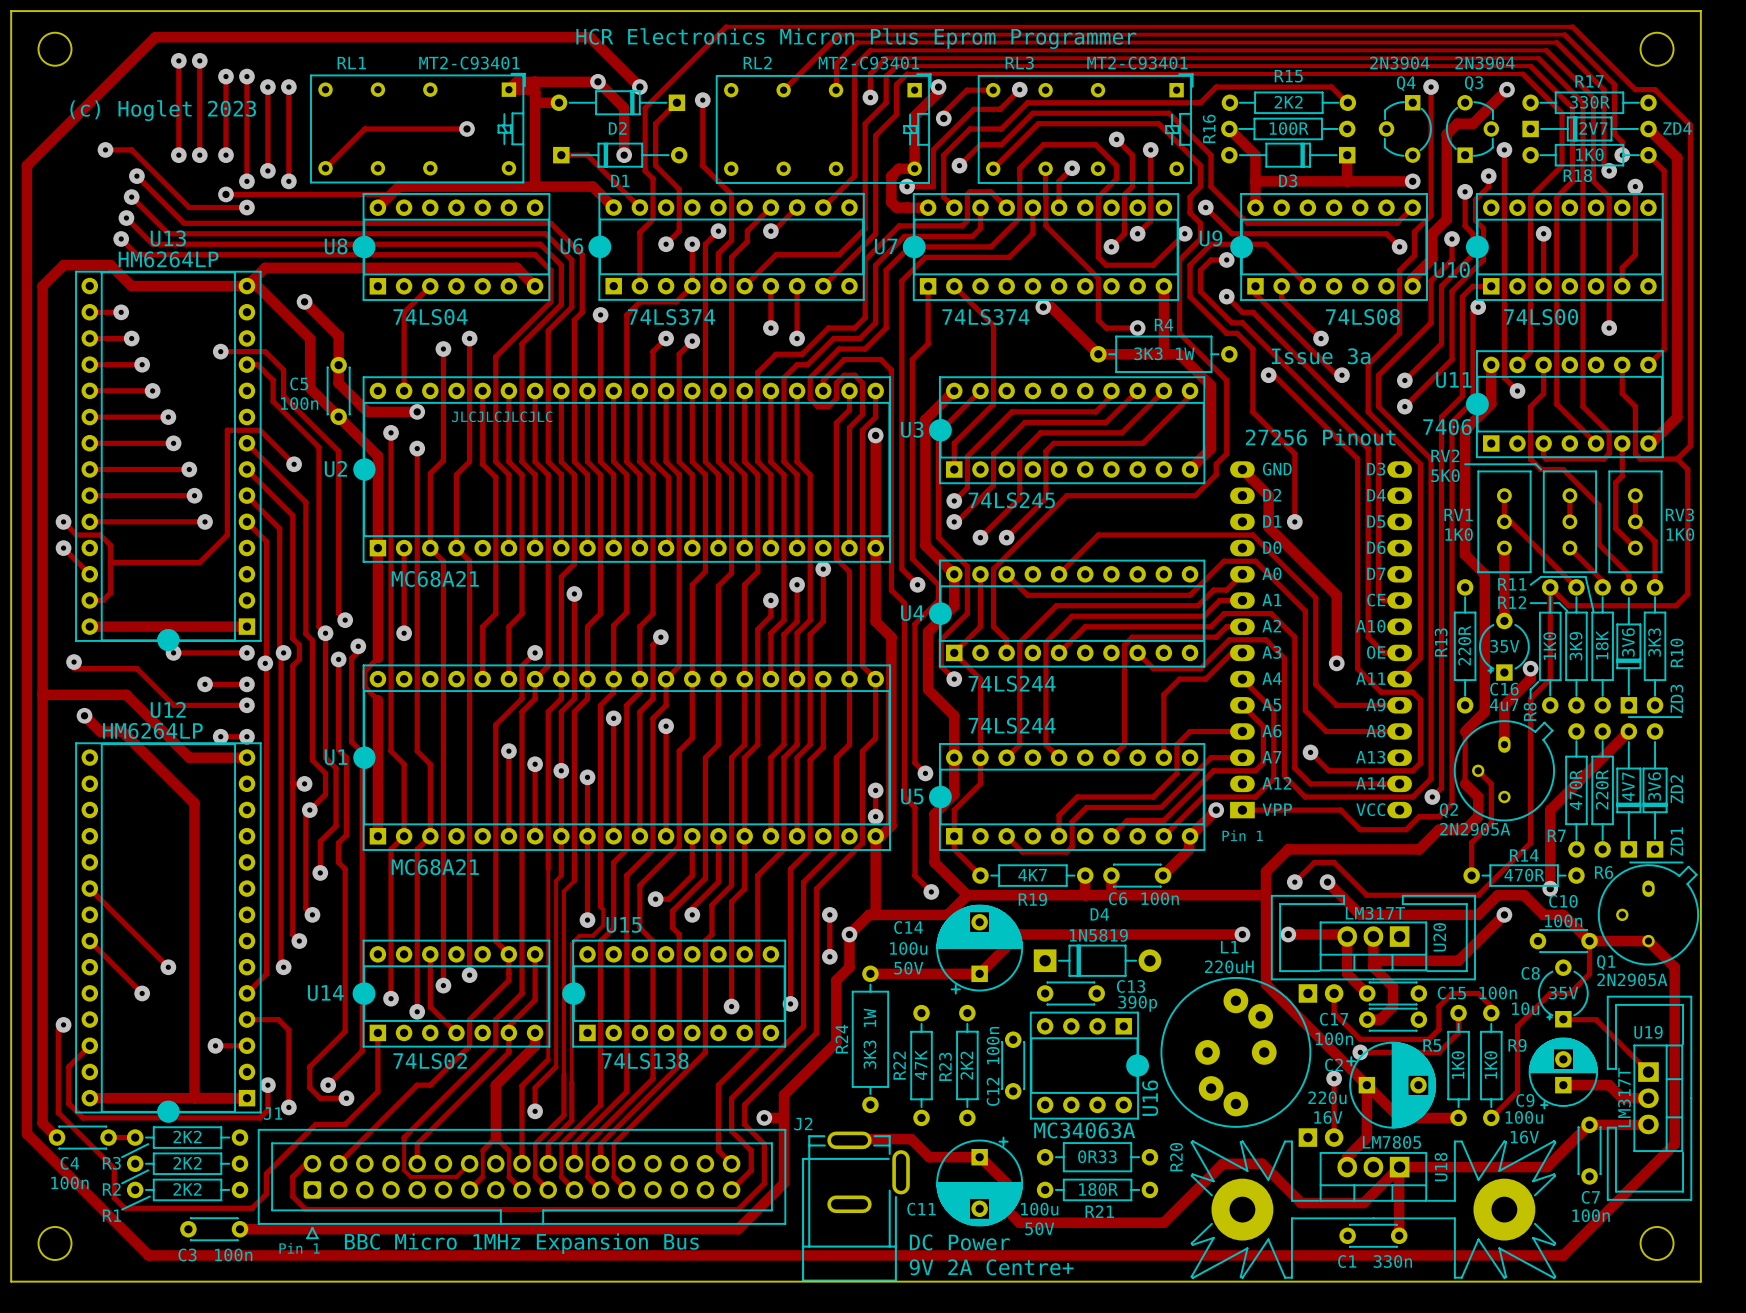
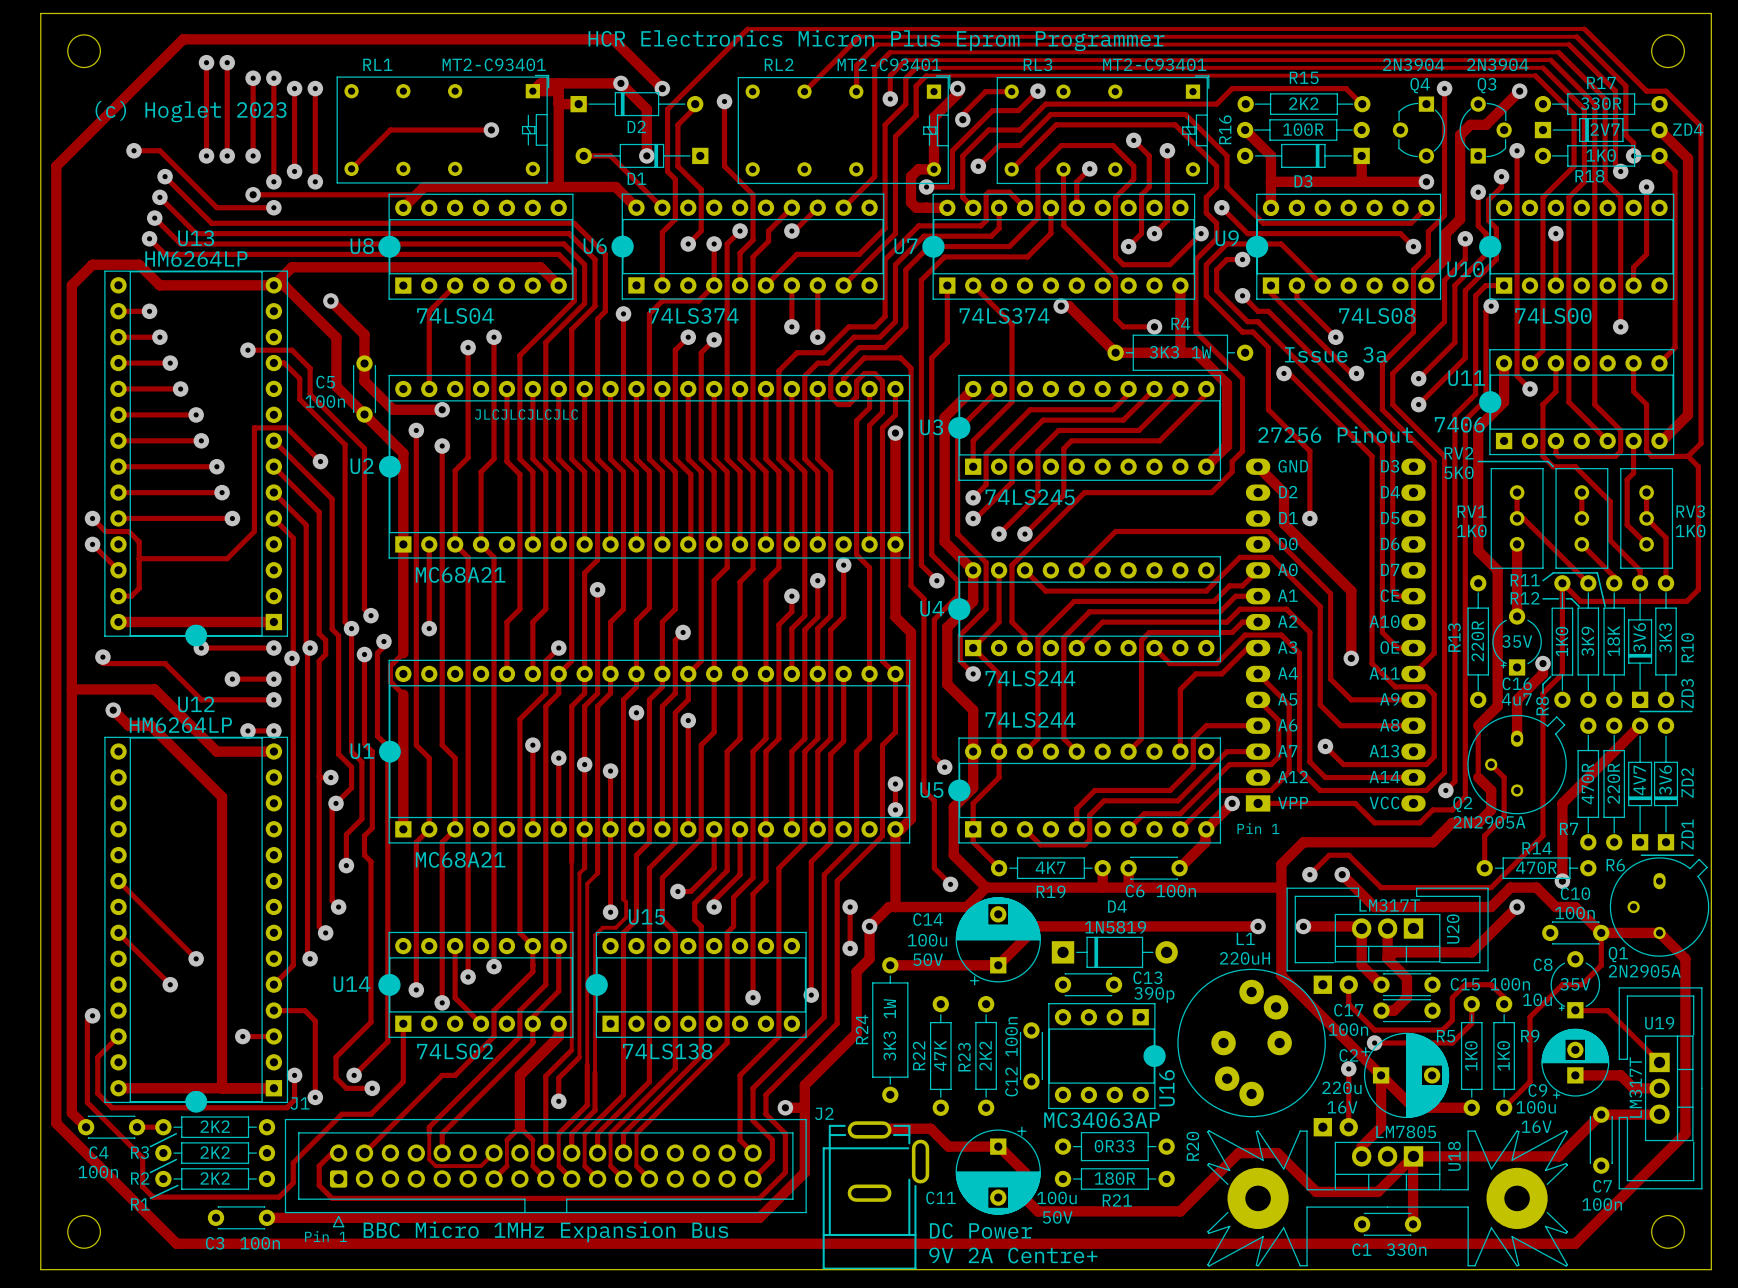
D2 rotation: 0° (617, 102) -> 180° (636, 104)
D1 rotation: 0° (620, 155) -> 180° (642, 155)
U16 value: MC34063A (1084, 1130) -> MC34063AP (1101, 1120)

